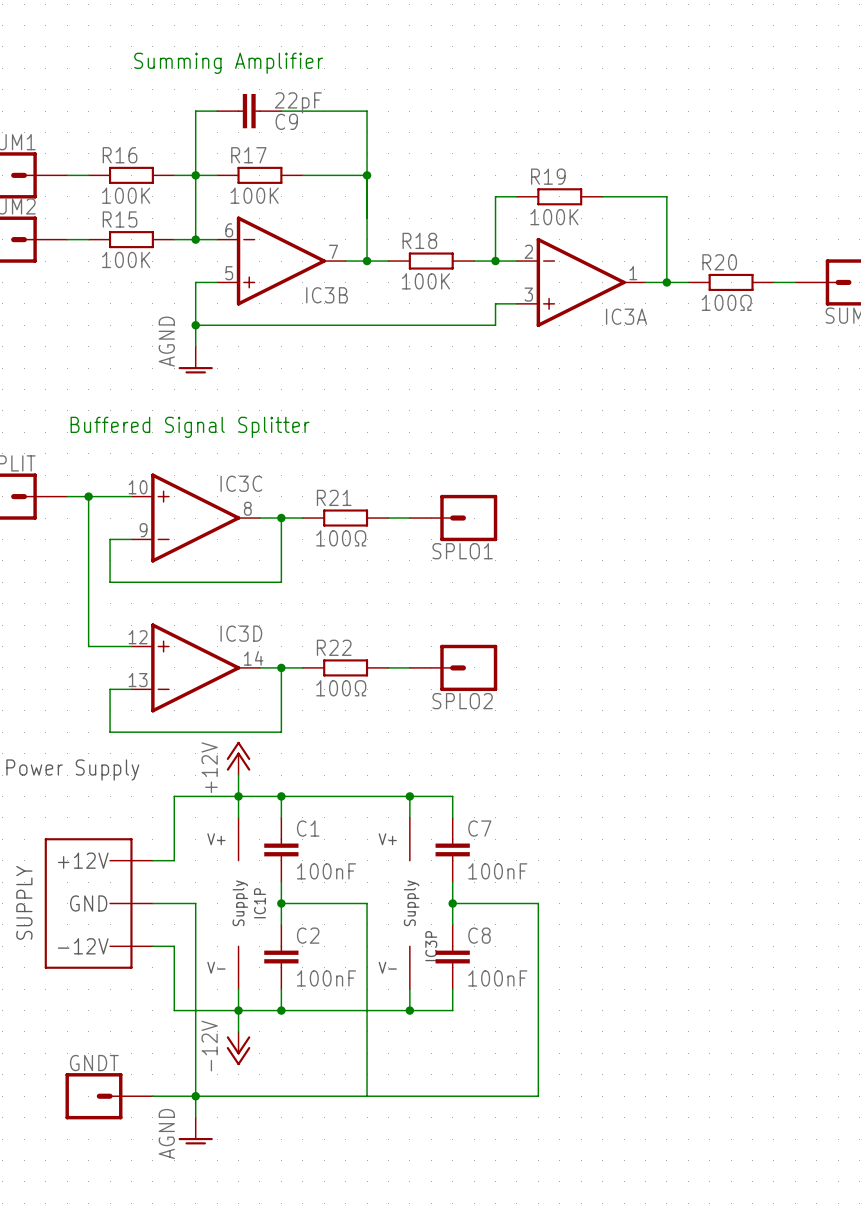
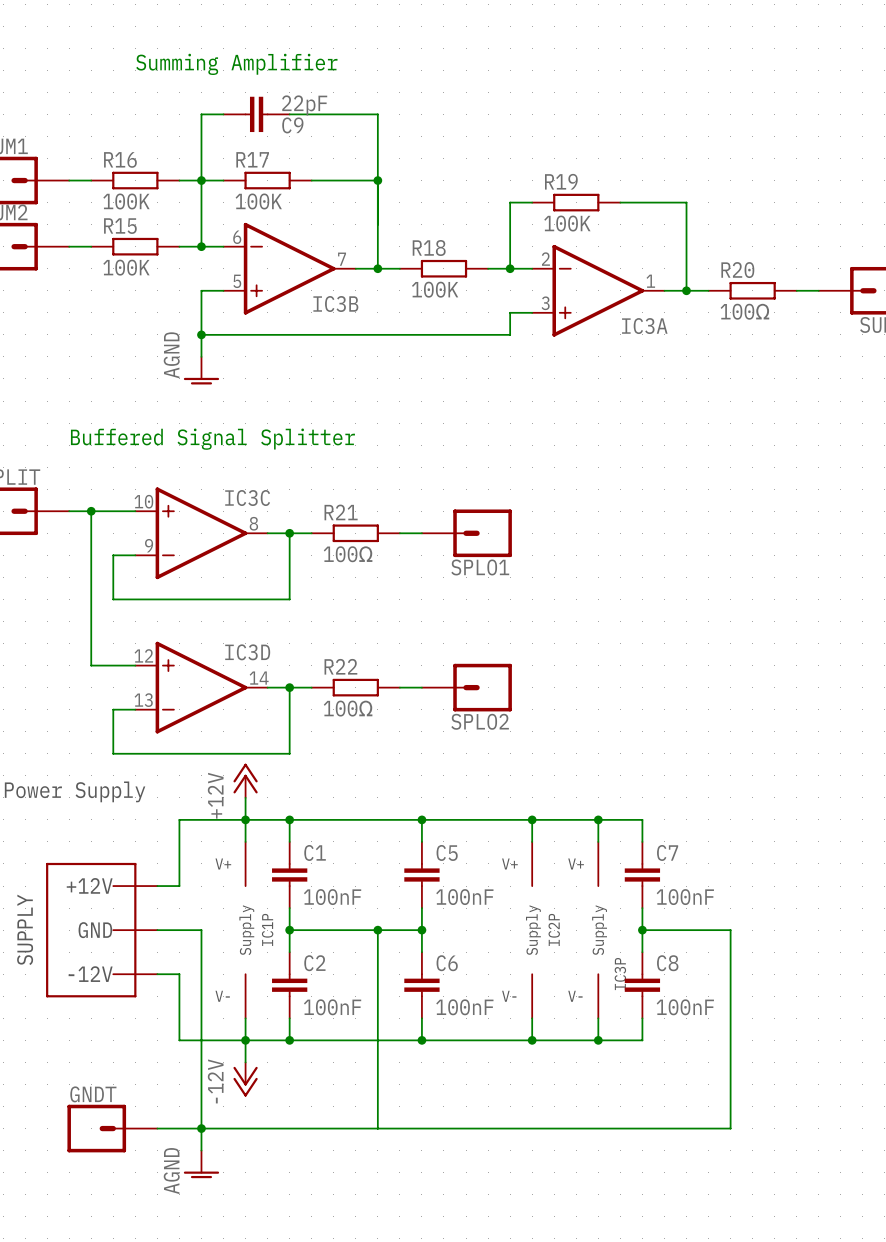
wire: (452, 796) (452, 817) -> (466, 819) (642, 819) (642, 841)
wire: none -> (532, 819) (532, 841)
junction: none -> (532, 819)
wire: none -> (598, 819) (598, 841)
junction: none -> (598, 819)
C5: none -> 100nF (421, 875)
C7 position: (452, 849) -> (642, 875)
wire: (452, 882) (452, 924) -> (421, 908) (421, 952)
wire: none -> (642, 908) (642, 952)
wire: none -> (377, 930) (421, 930)
junction: none -> (377, 930)
IC3P position: (409, 903) -> (598, 930)
junction: none -> (421, 930)
wire: (452, 903) (538, 903) (538, 1096) -> (642, 930) (730, 930) (730, 1128) (554, 1128)
junction: (452, 903) -> none
IC2P: none -> (532, 930)
junction: none -> (642, 930)
C6: none -> 100nF (421, 985)
C8 position: (452, 957) -> (642, 985)
wire: (452, 989) (452, 1010) -> (642, 1018) (642, 1040) (466, 1040)
wire: none -> (532, 1018) (532, 1040)
wire: none -> (598, 1018) (598, 1040)
junction: none -> (532, 1040)
junction: none -> (598, 1040)

